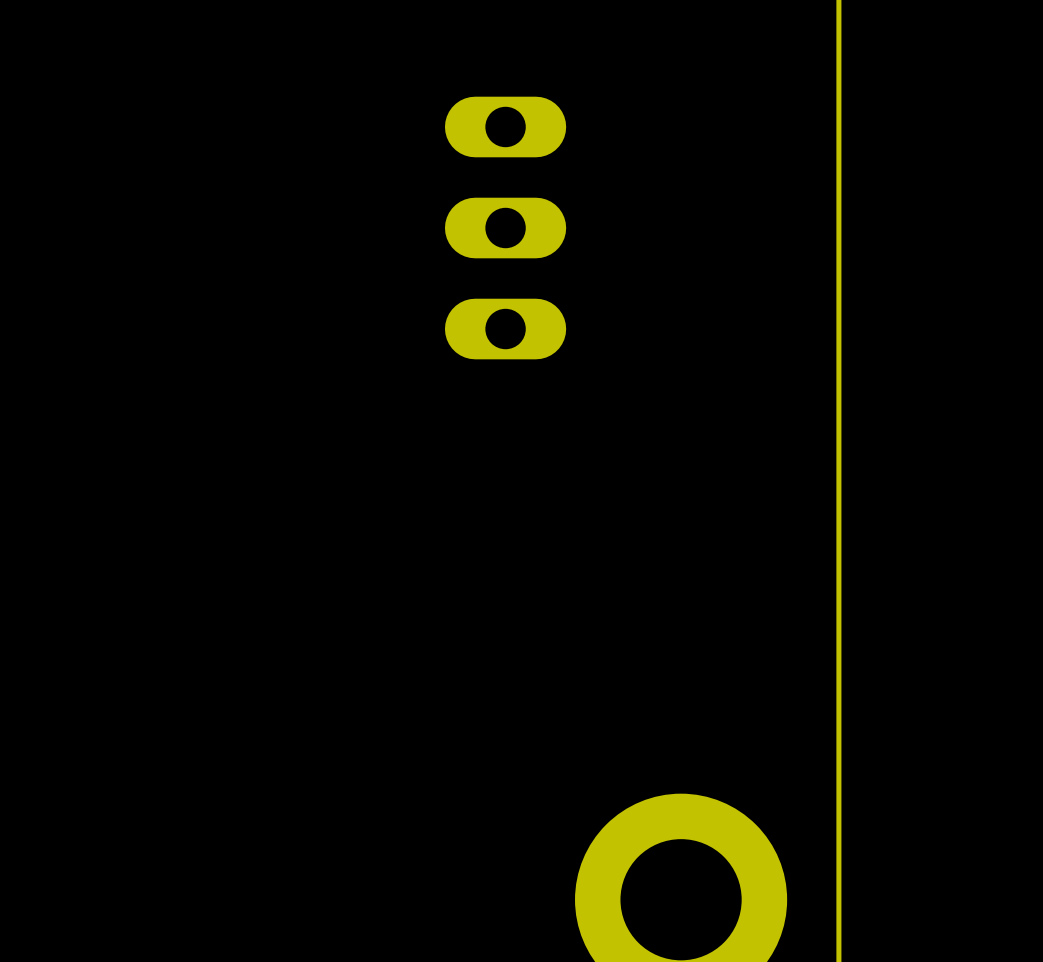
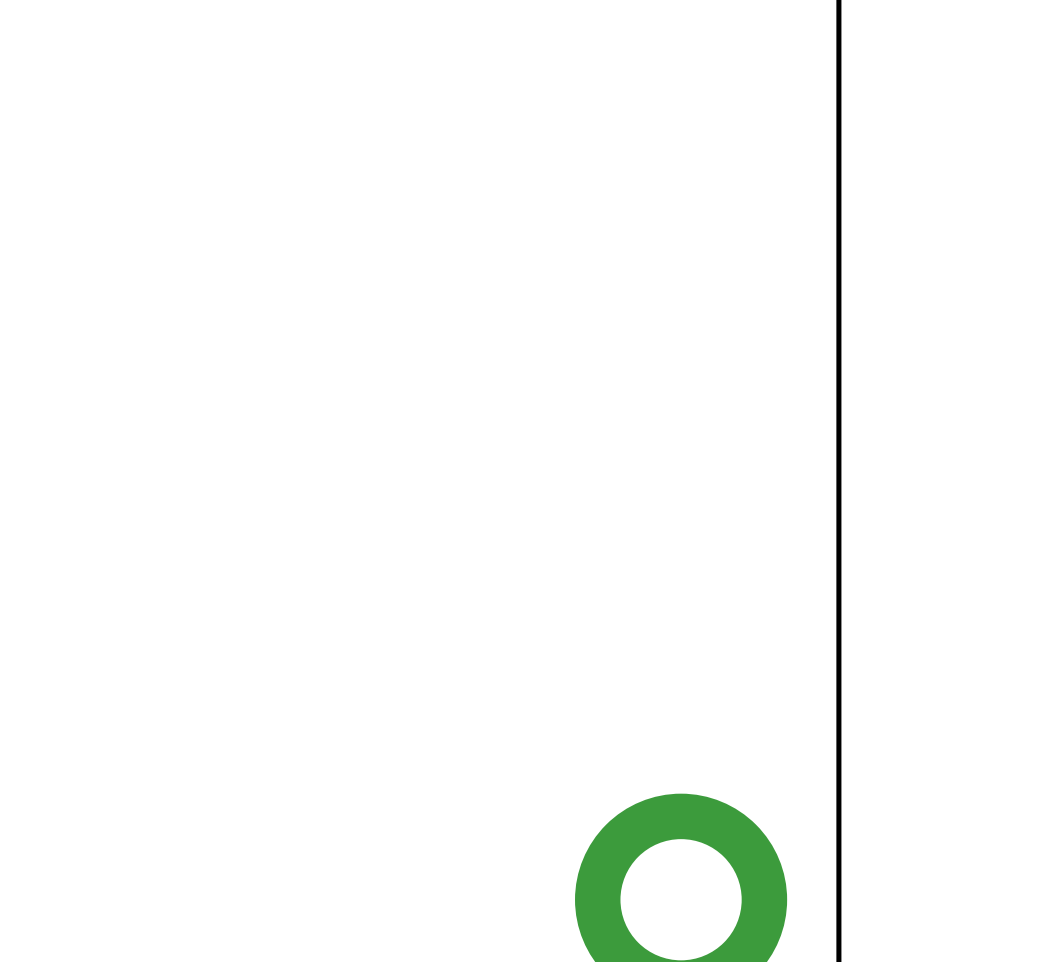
part: (505, 228) -> none

